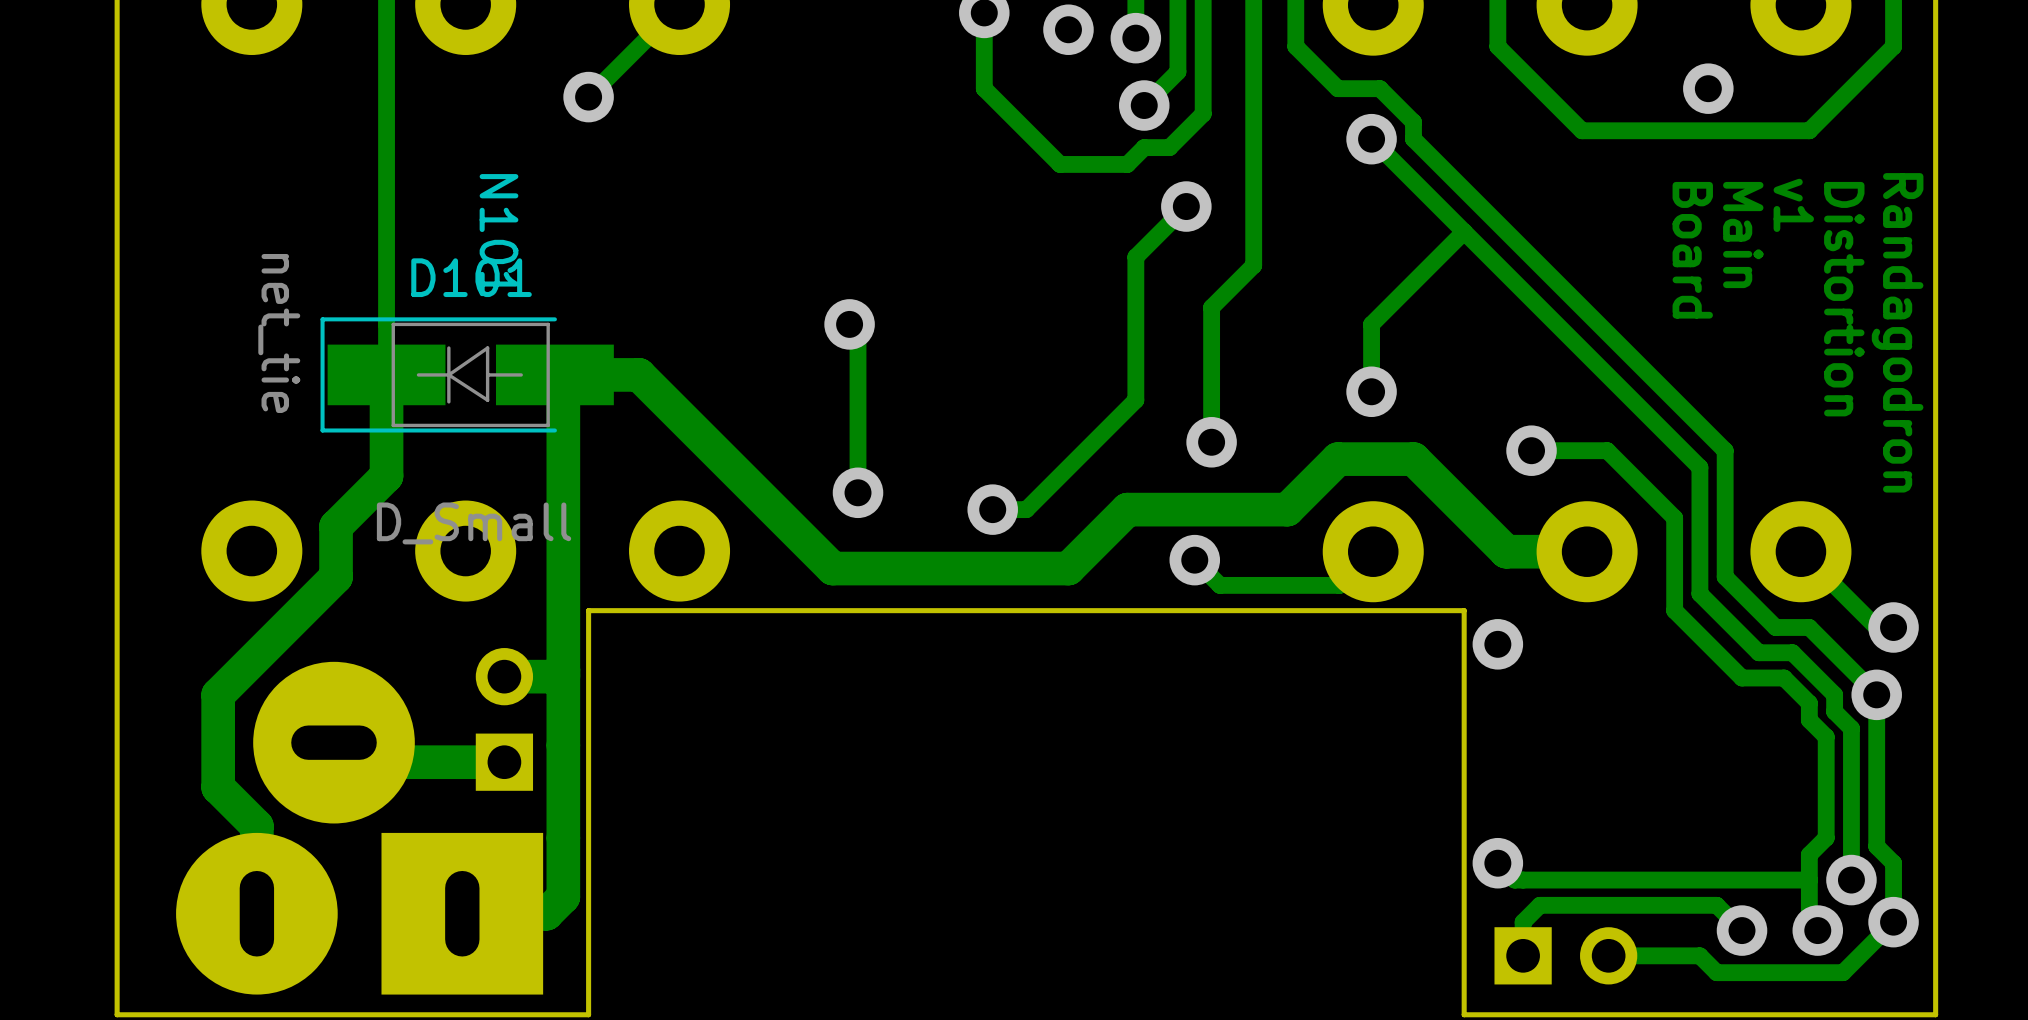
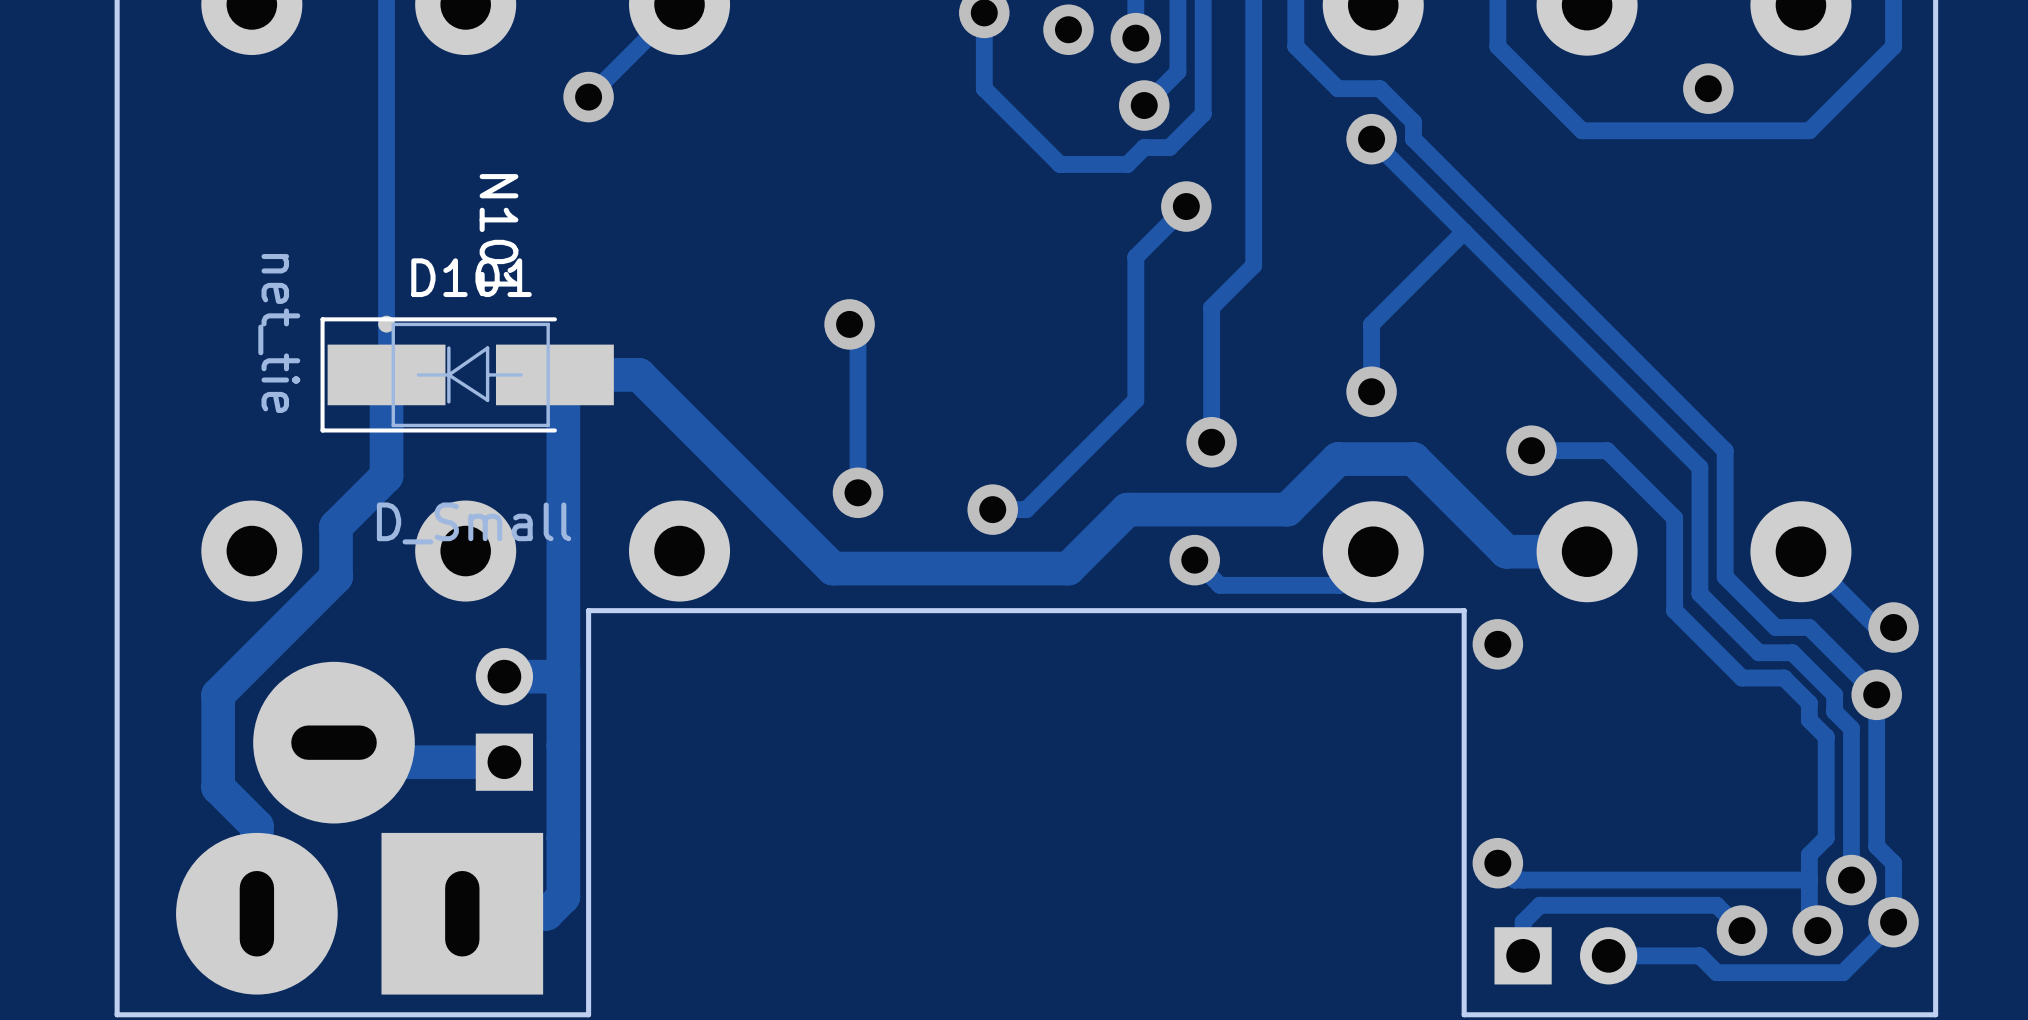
text: v1 (1793, 205) -> none
text: Main (1743, 235) -> none
text: Board (1692, 250) -> none
text: Distortion (1844, 299) -> none
text: Randagodron (1897, 332) -> none

